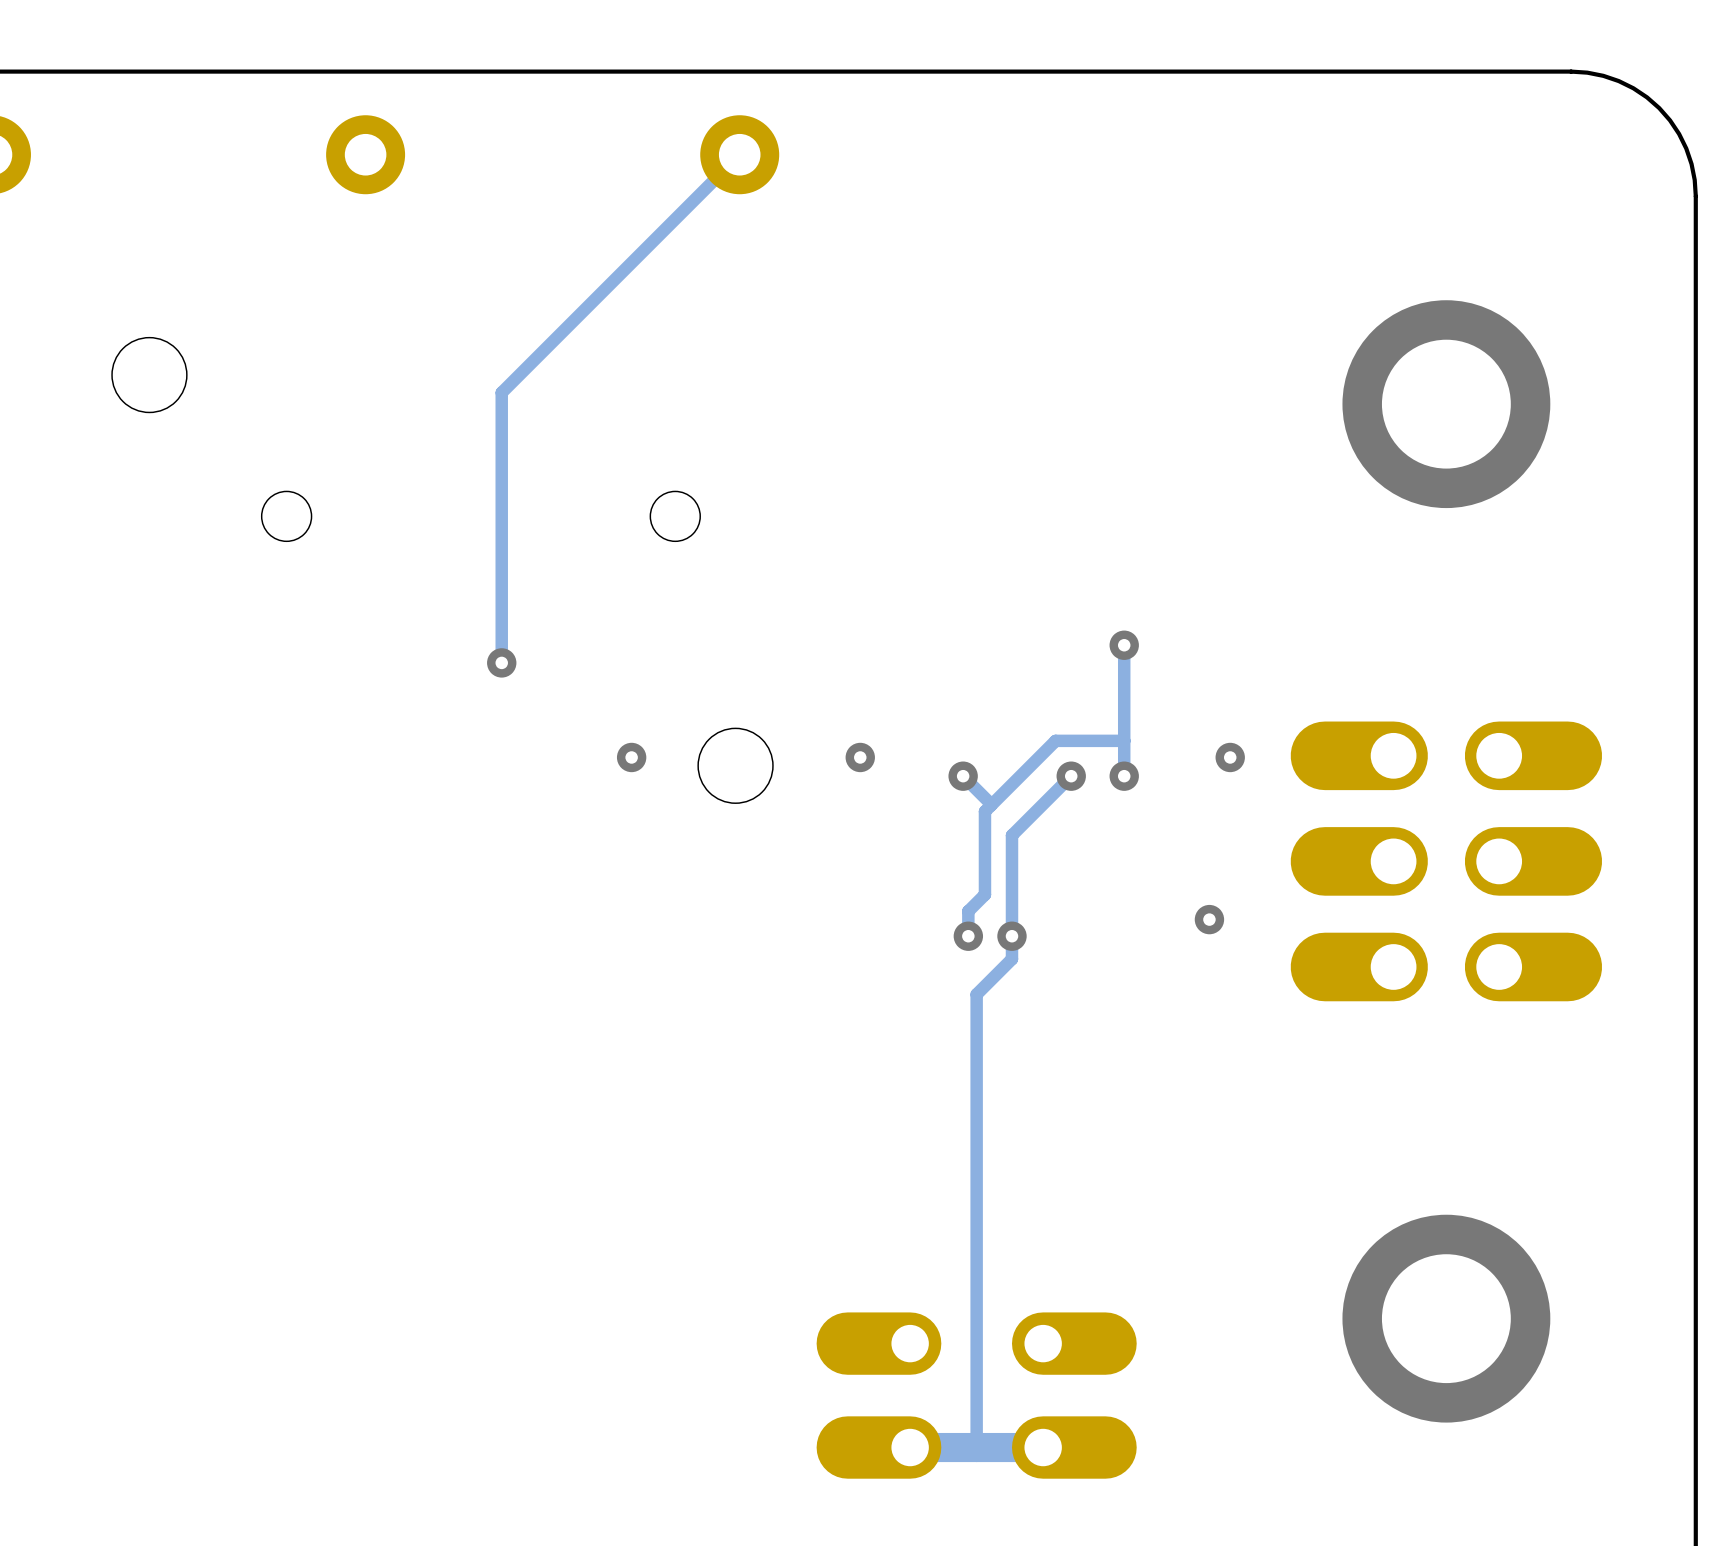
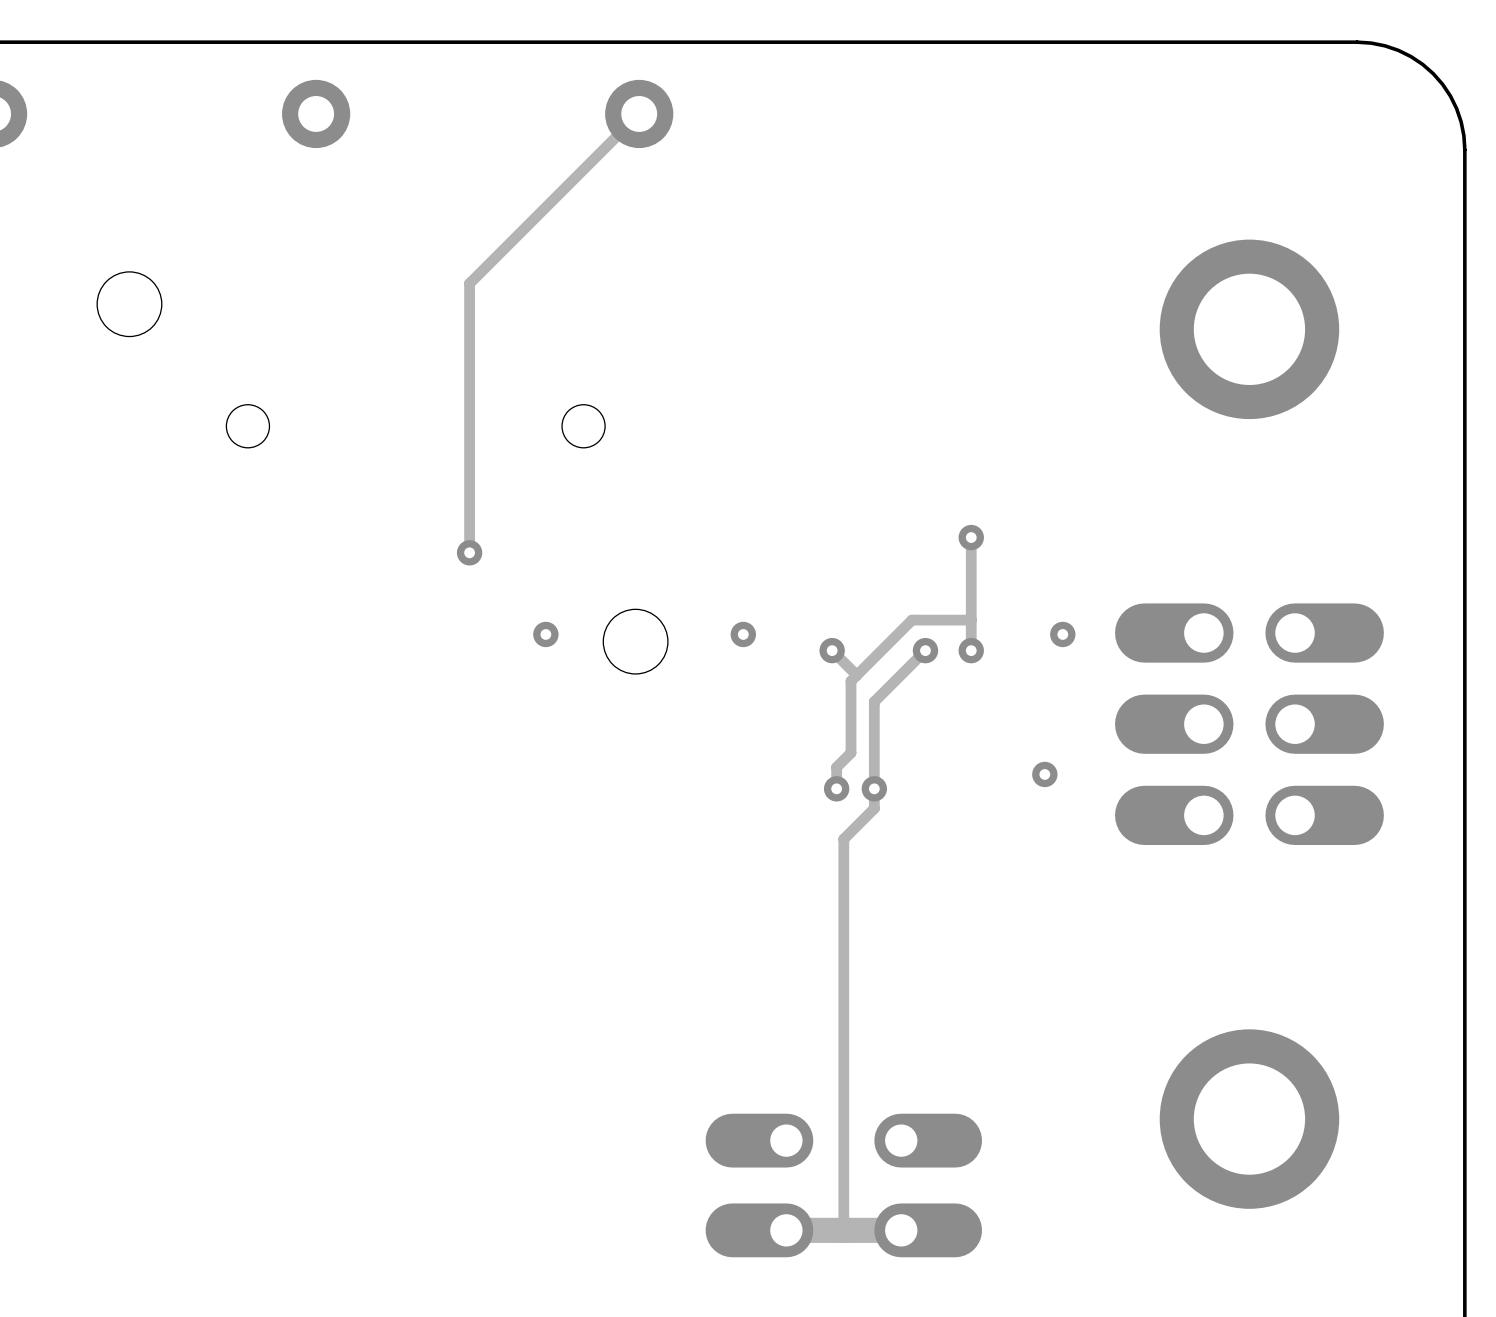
track: (543, 351) (501, 392) (501, 662) -> (469, 283) (469, 552)
via position: (501, 662) -> (469, 552)

